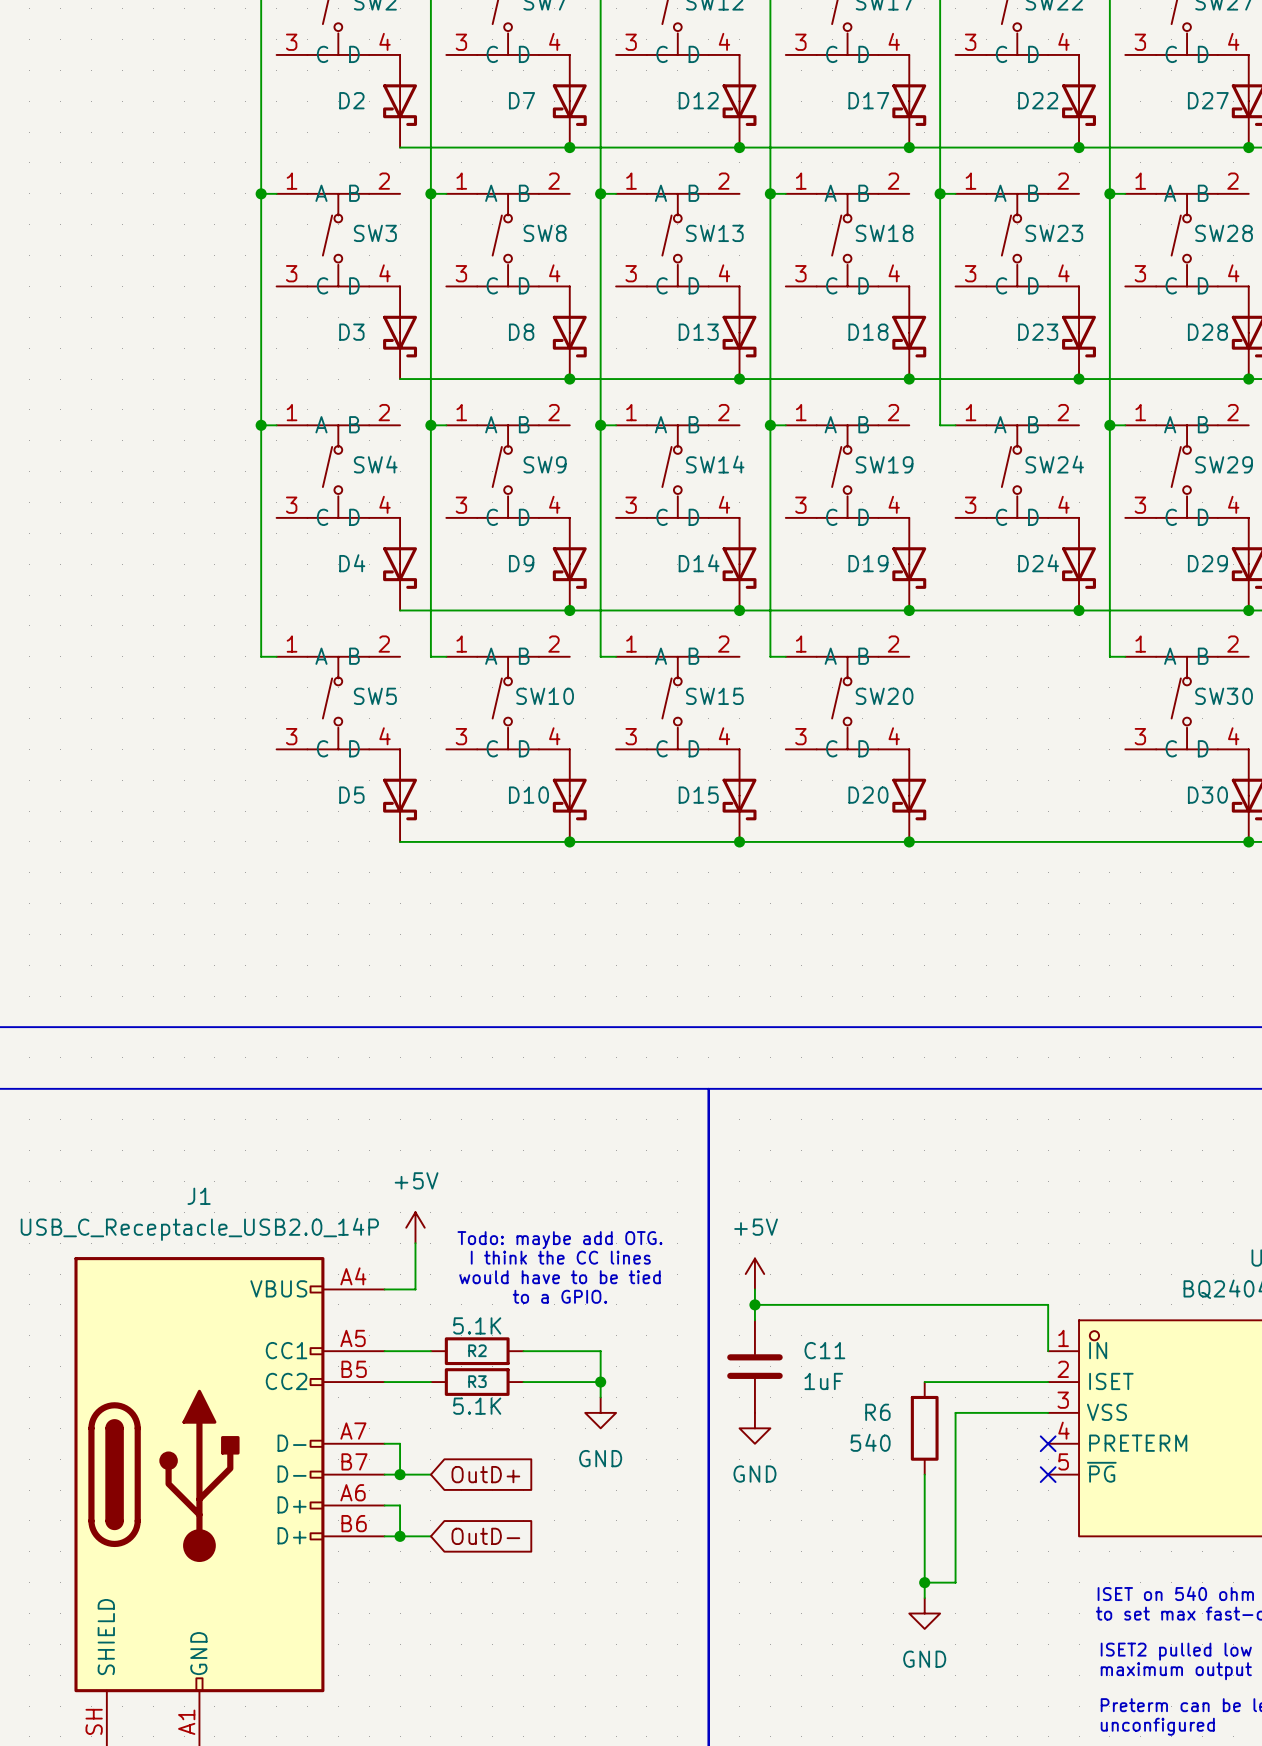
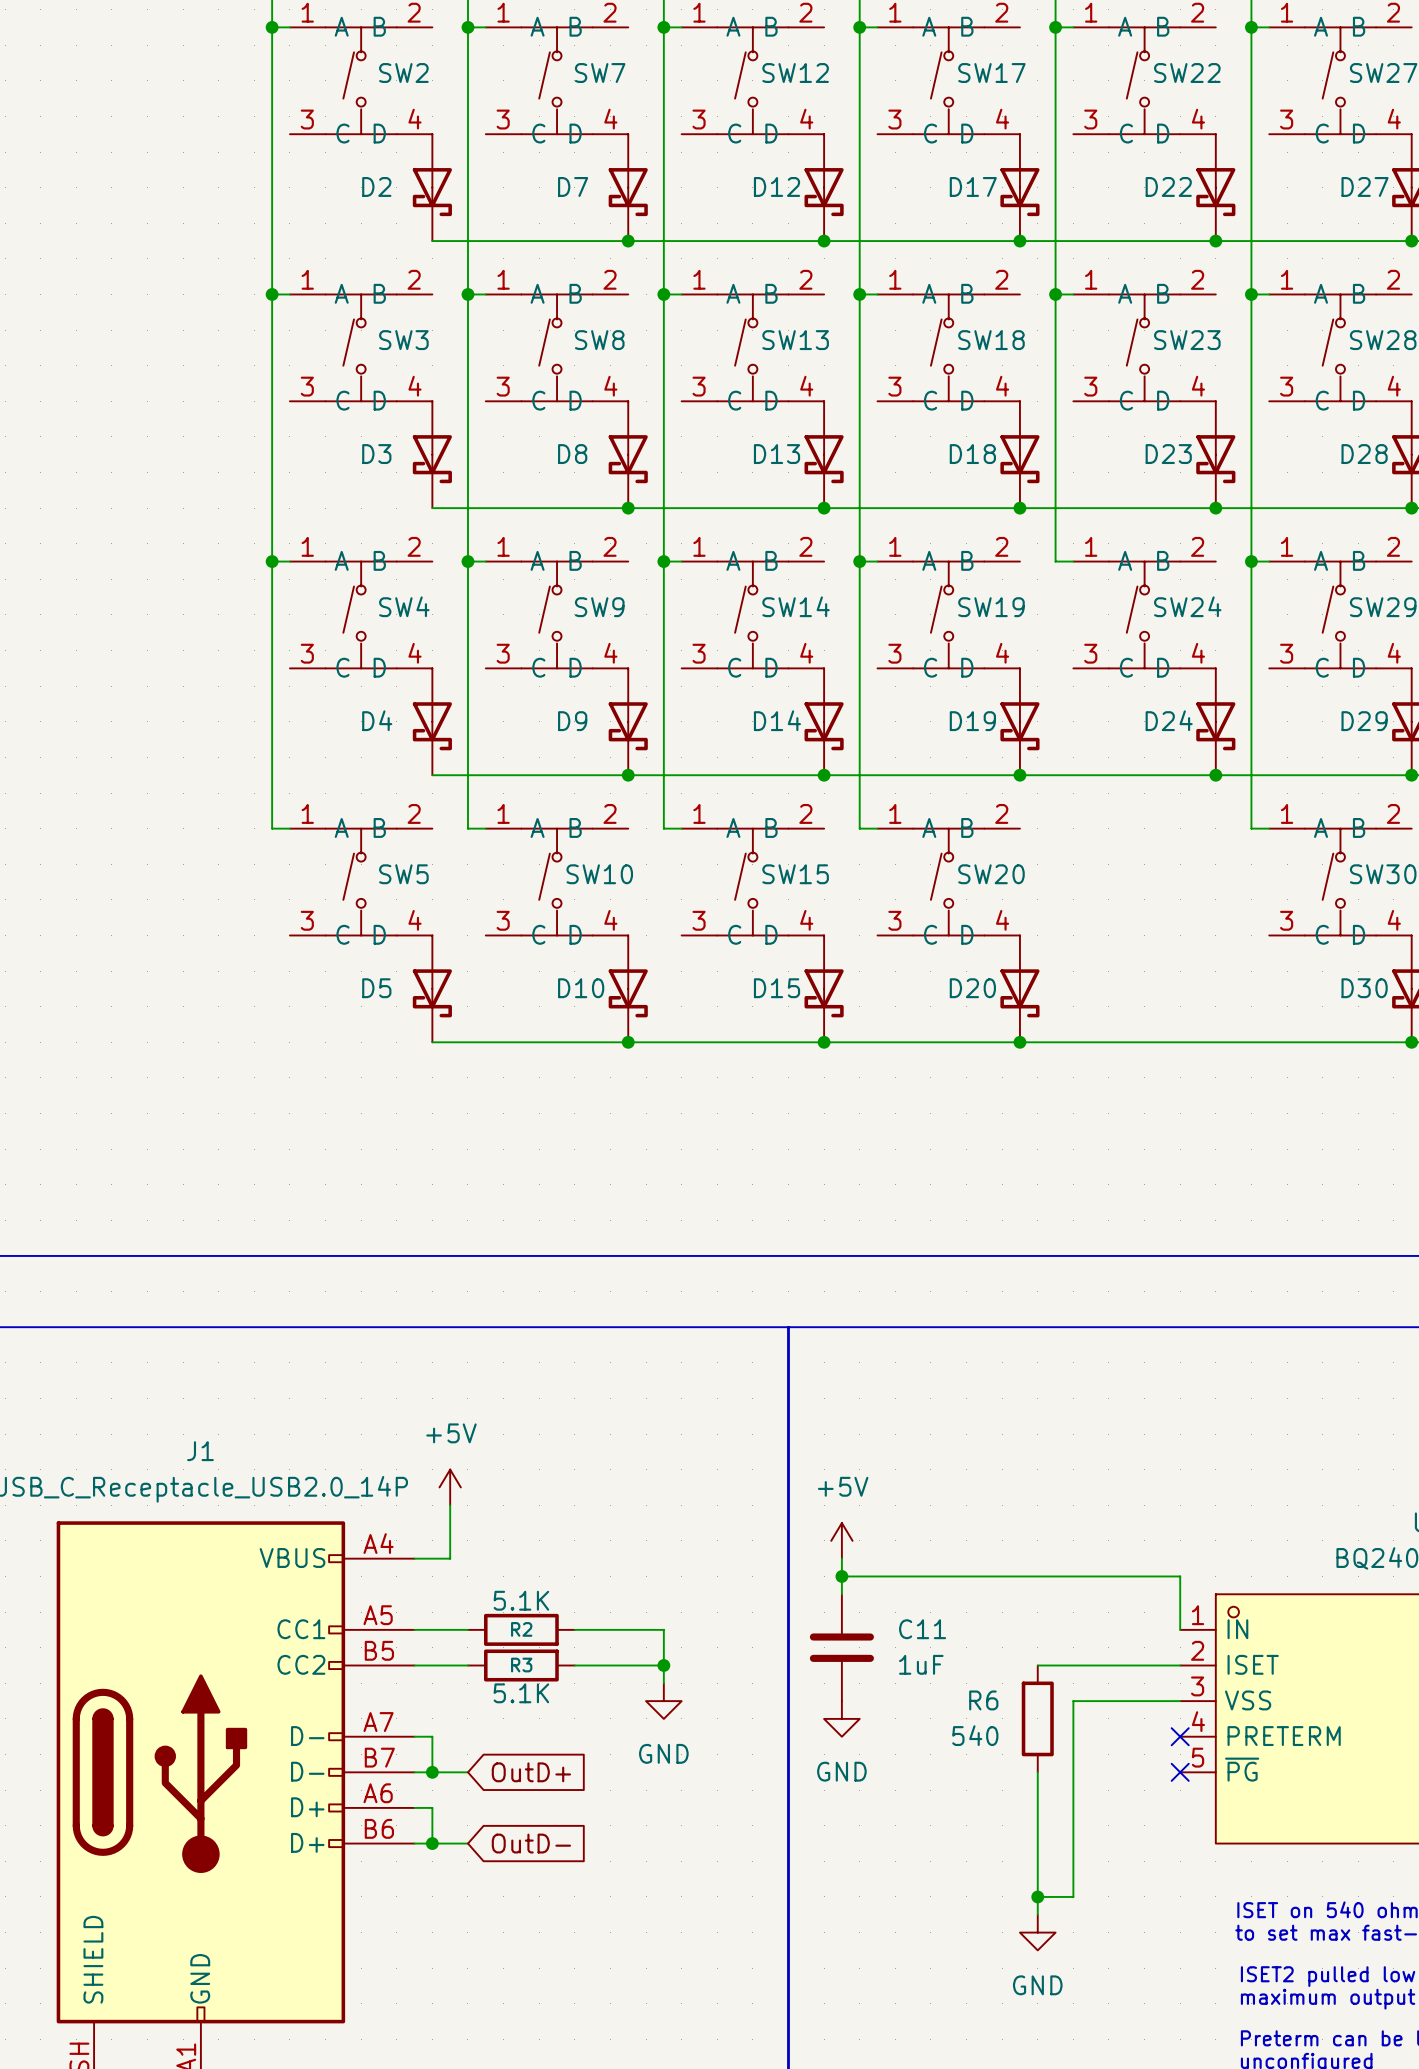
text: Todo: maybe add OTG. (559, 1240) -> none
text: I think the CC lines (560, 1257) -> none
text: would have to be tied (559, 1277) -> none
text: to a GPIO. (559, 1296) -> none

